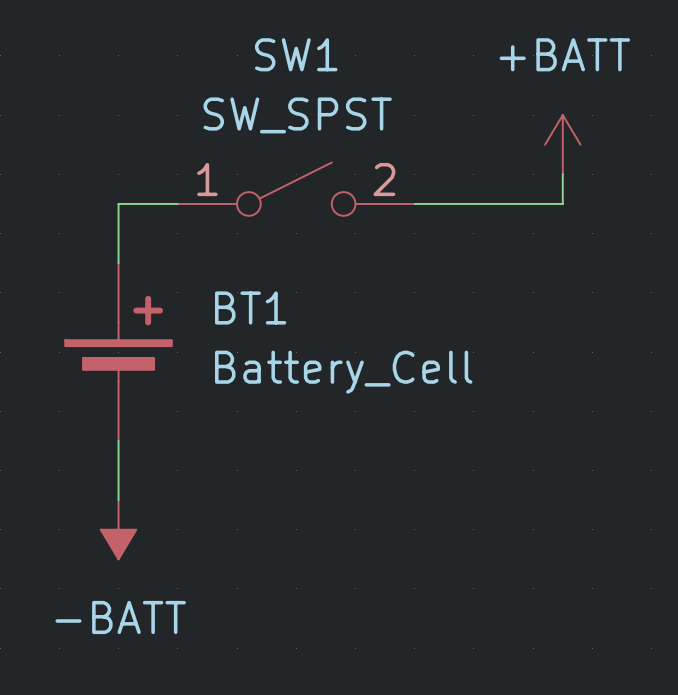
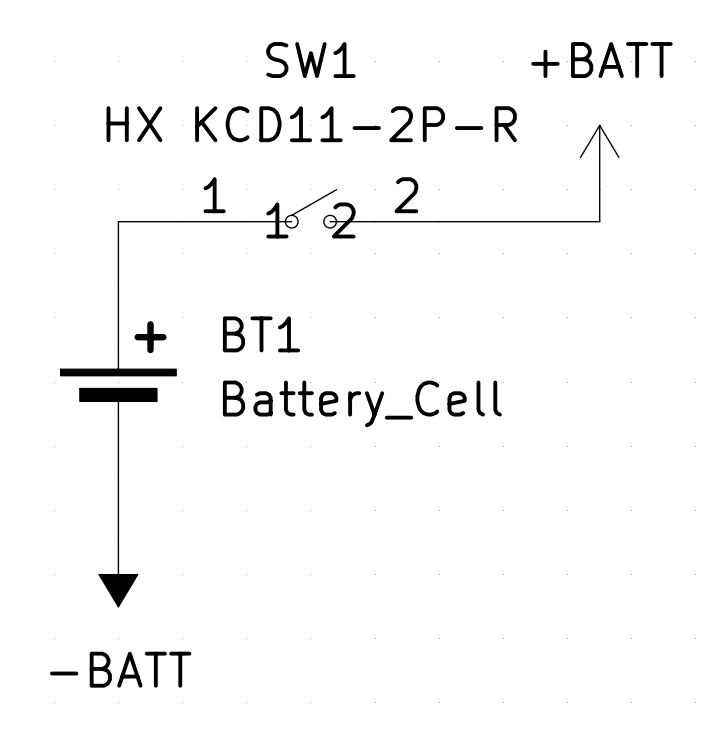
SW1 value: SW_SPST (297, 115) -> HX KCD11-2P-R (311, 124)
SW1 symbol: [177, 162, 415, 216] -> [182, 189, 440, 228]

